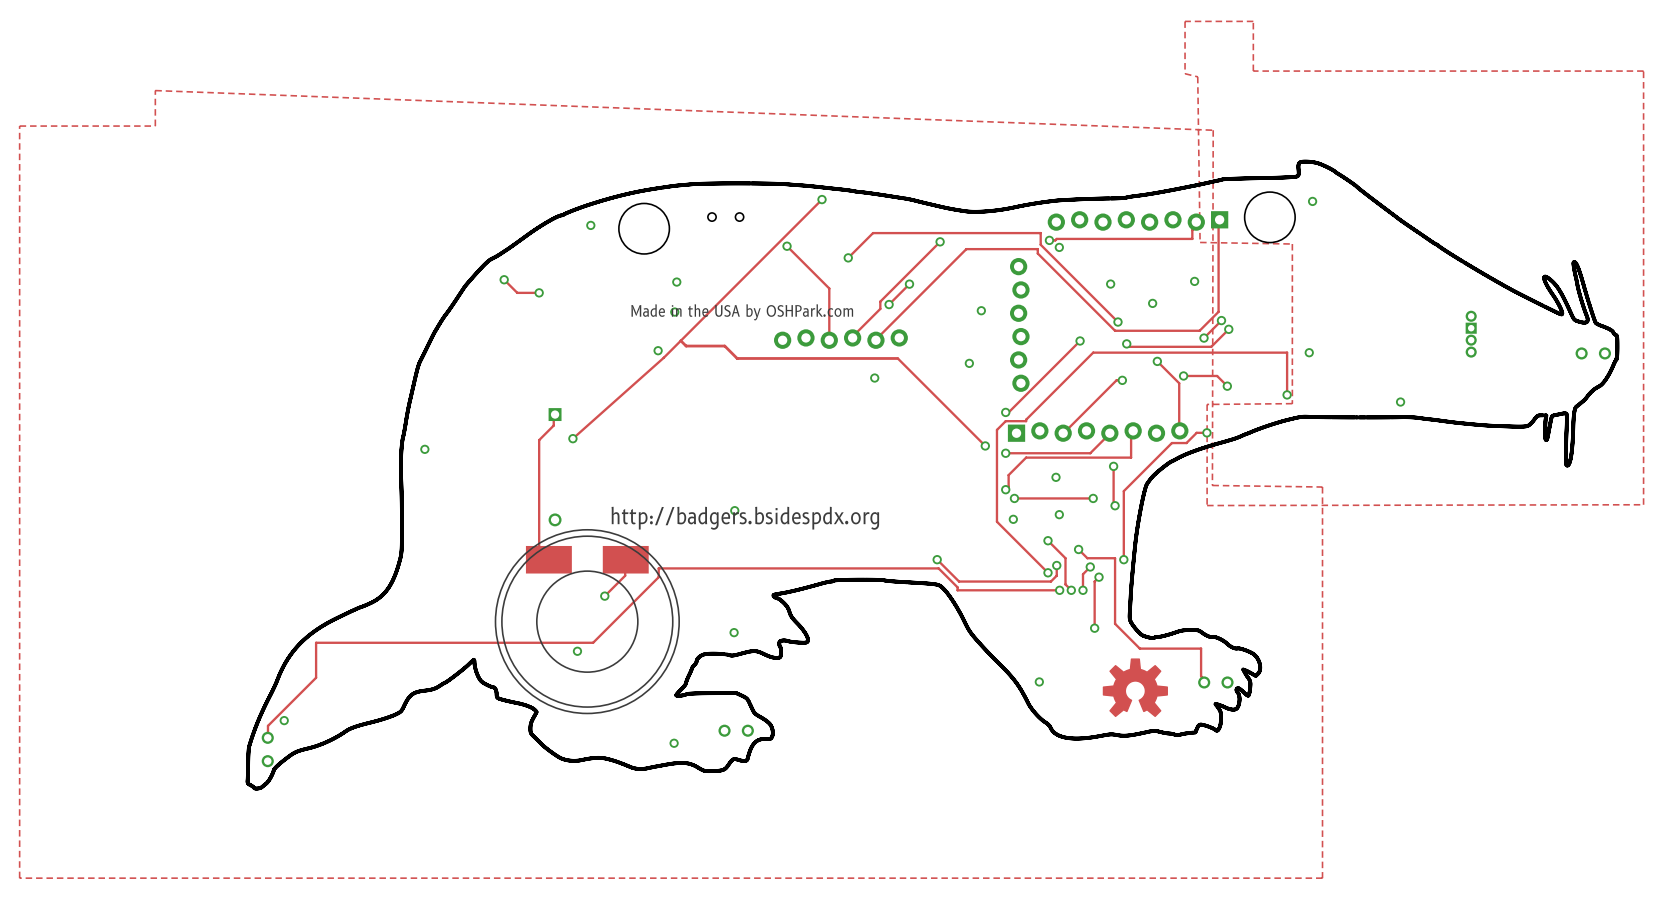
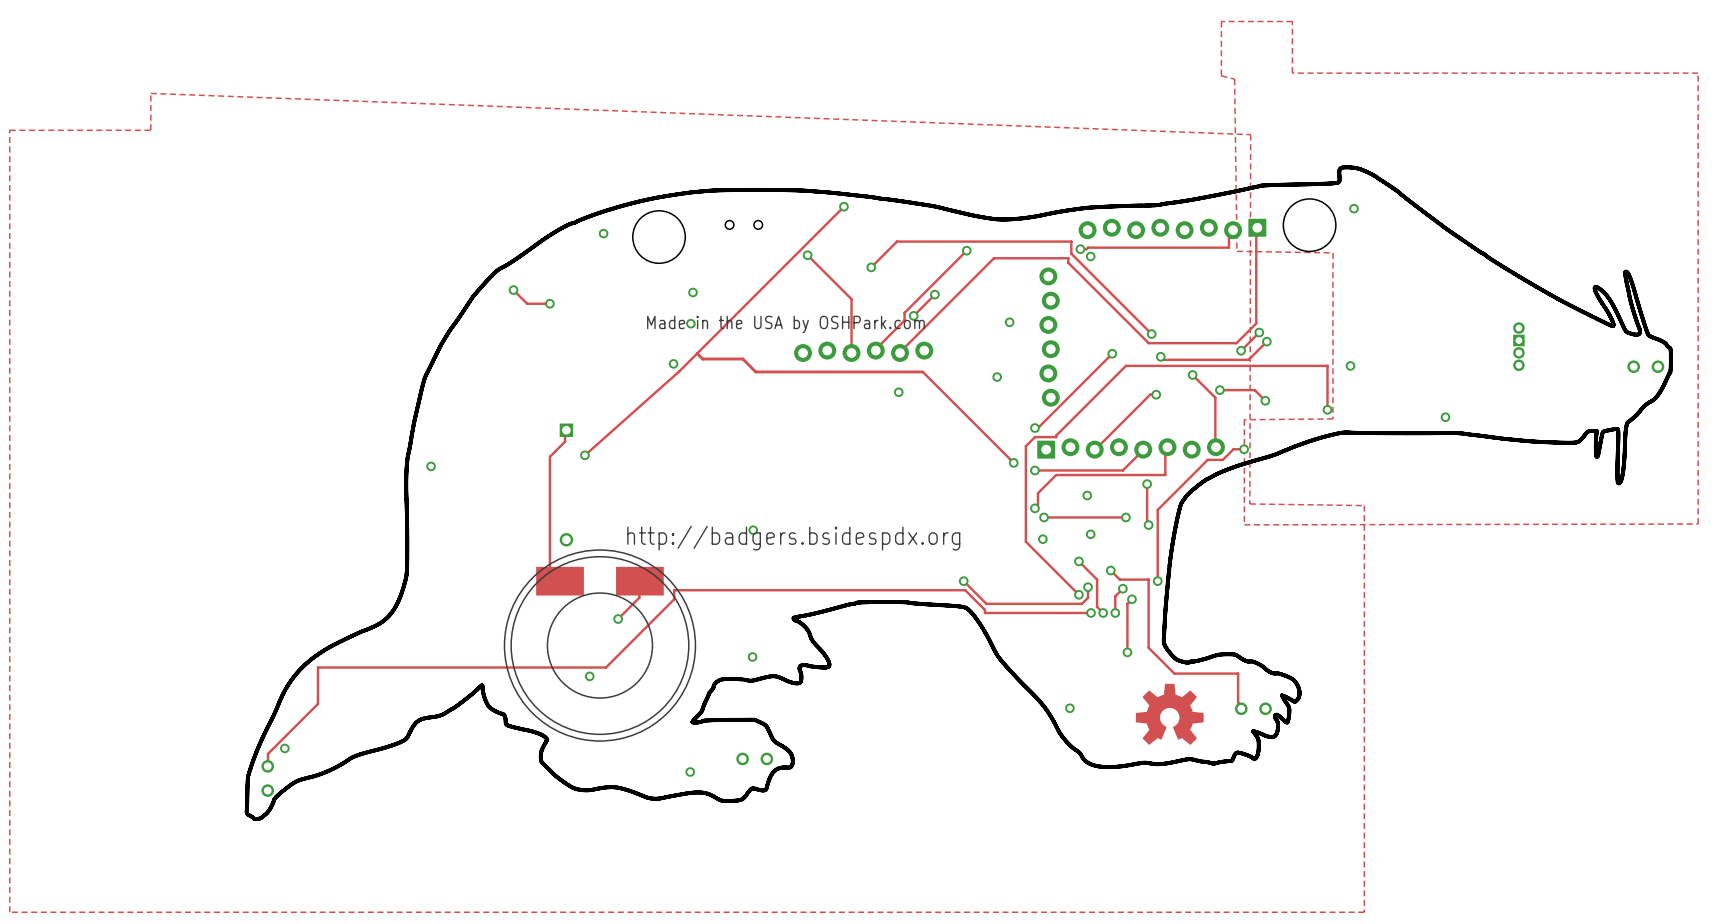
via: (1194, 281) -> none
via: (1110, 284) -> none
via: (1152, 303) -> none

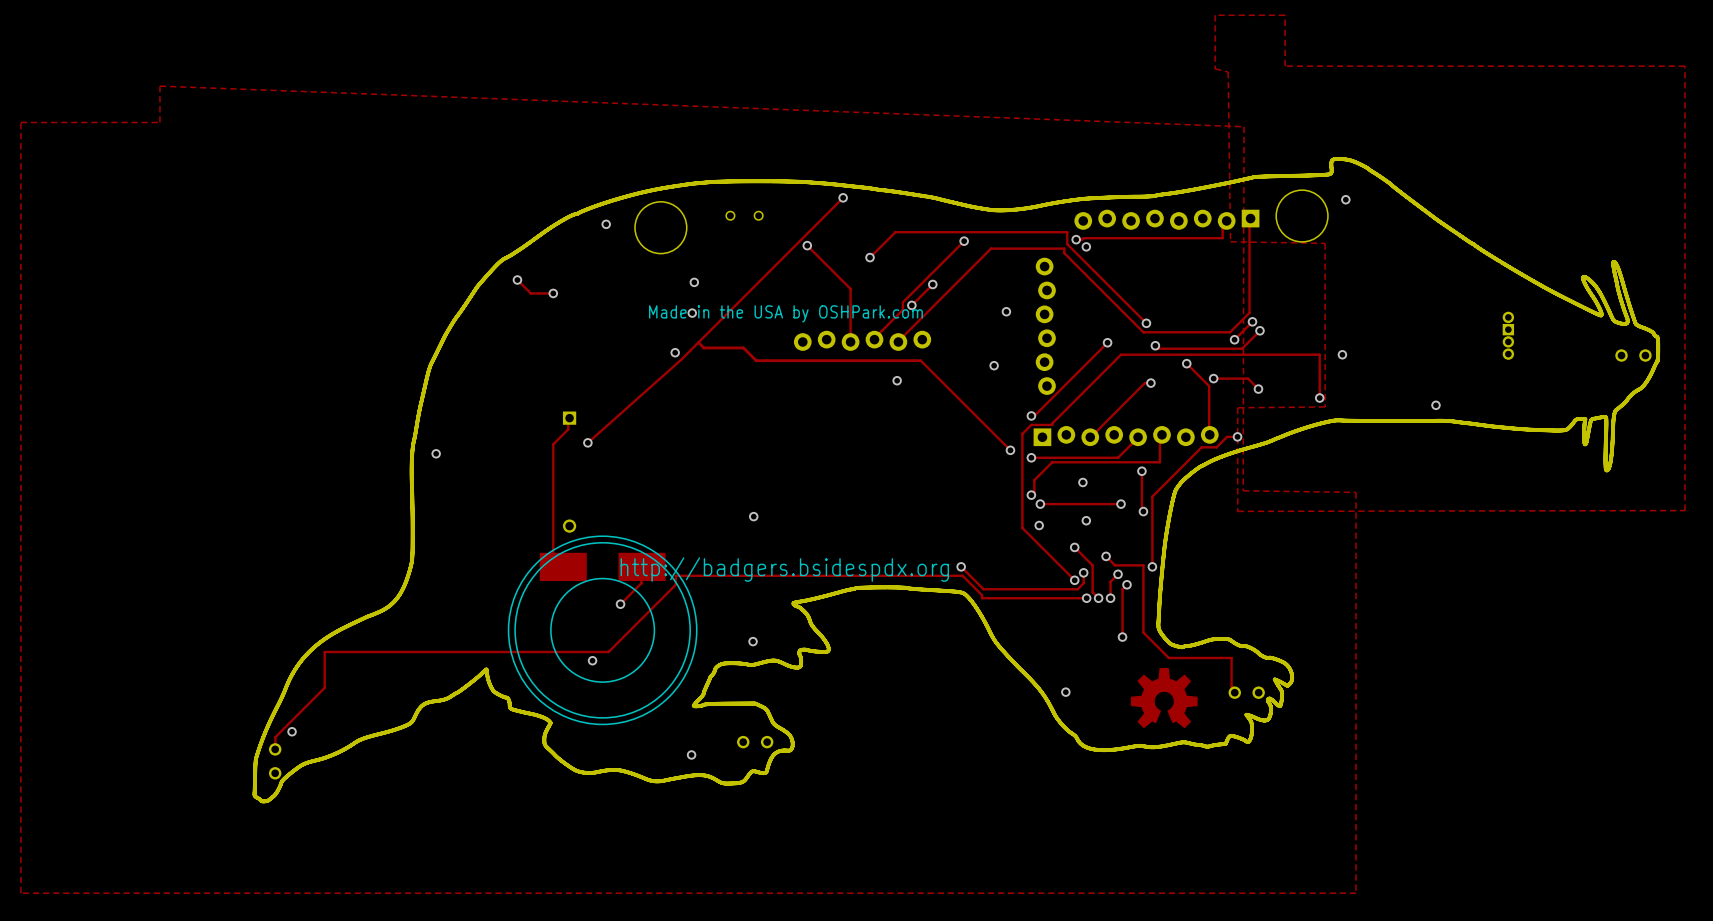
text position: http://badgers.bsidespdx.org (793, 538) -> http://badgers.bsidespdx.org (784, 569)

